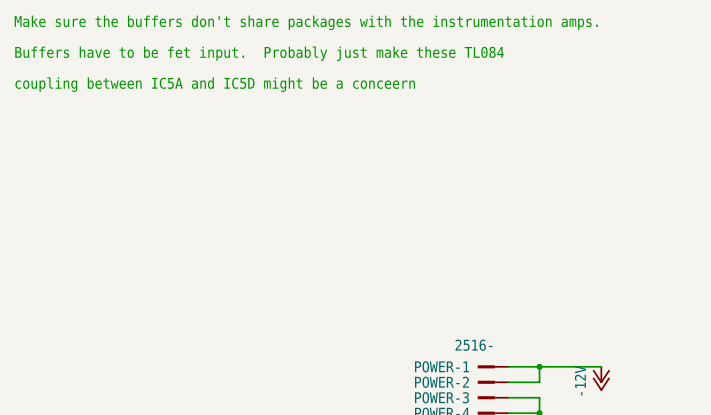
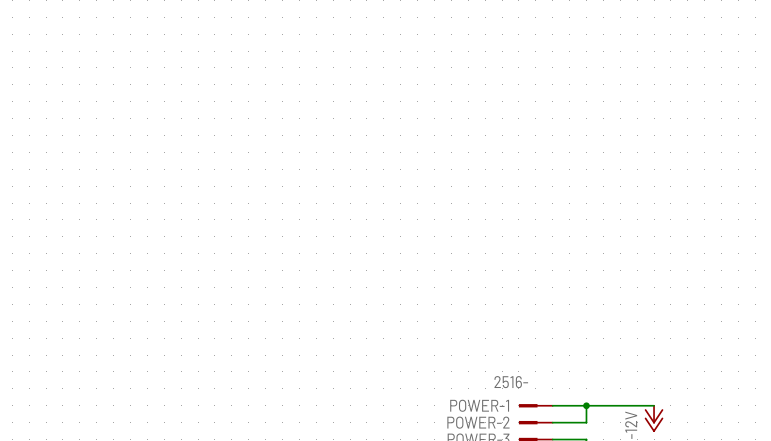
text: Make sure the buffers don't share packages with the instrumentation amps. (306, 22) -> none
text: Buffers have to be fet input. Probably just make these TL084 (259, 53) -> none
text: coupling between IC5A and IC5D might be a conceern (215, 84) -> none

